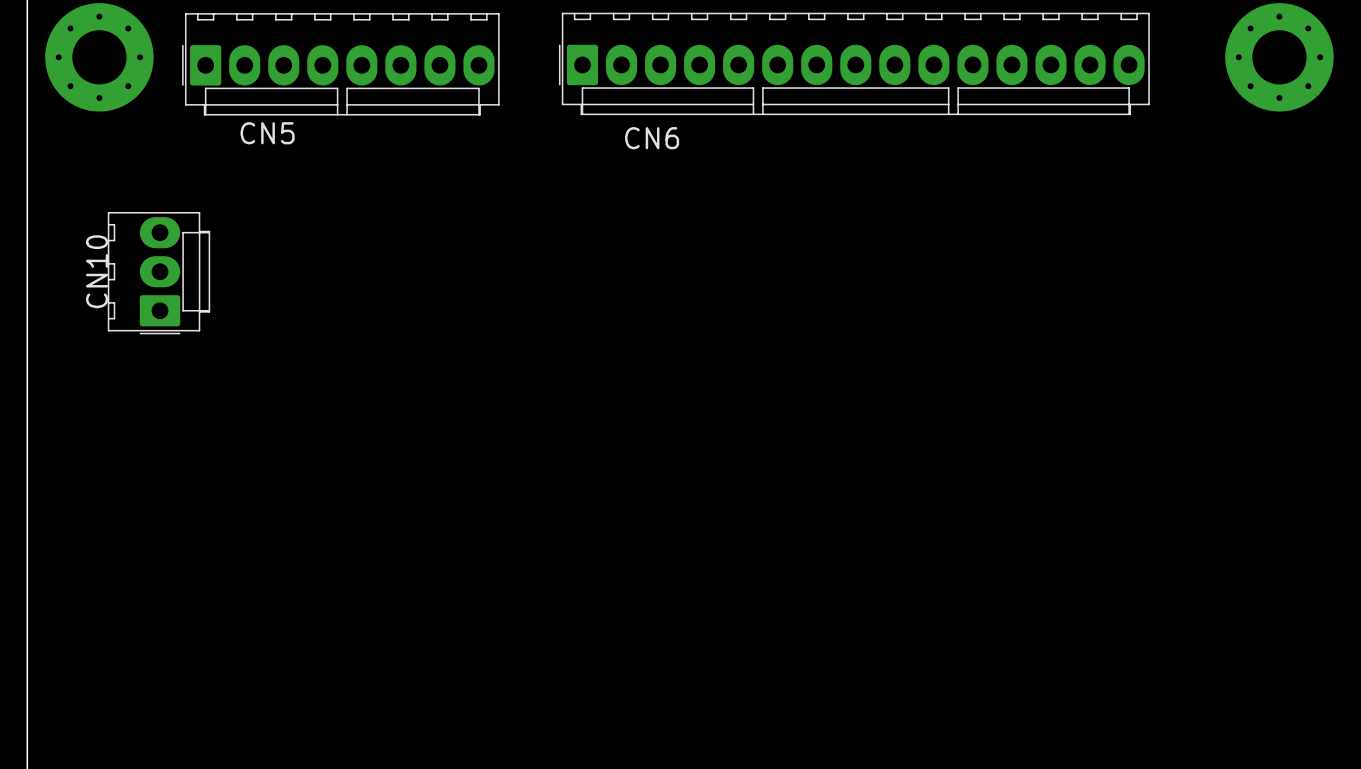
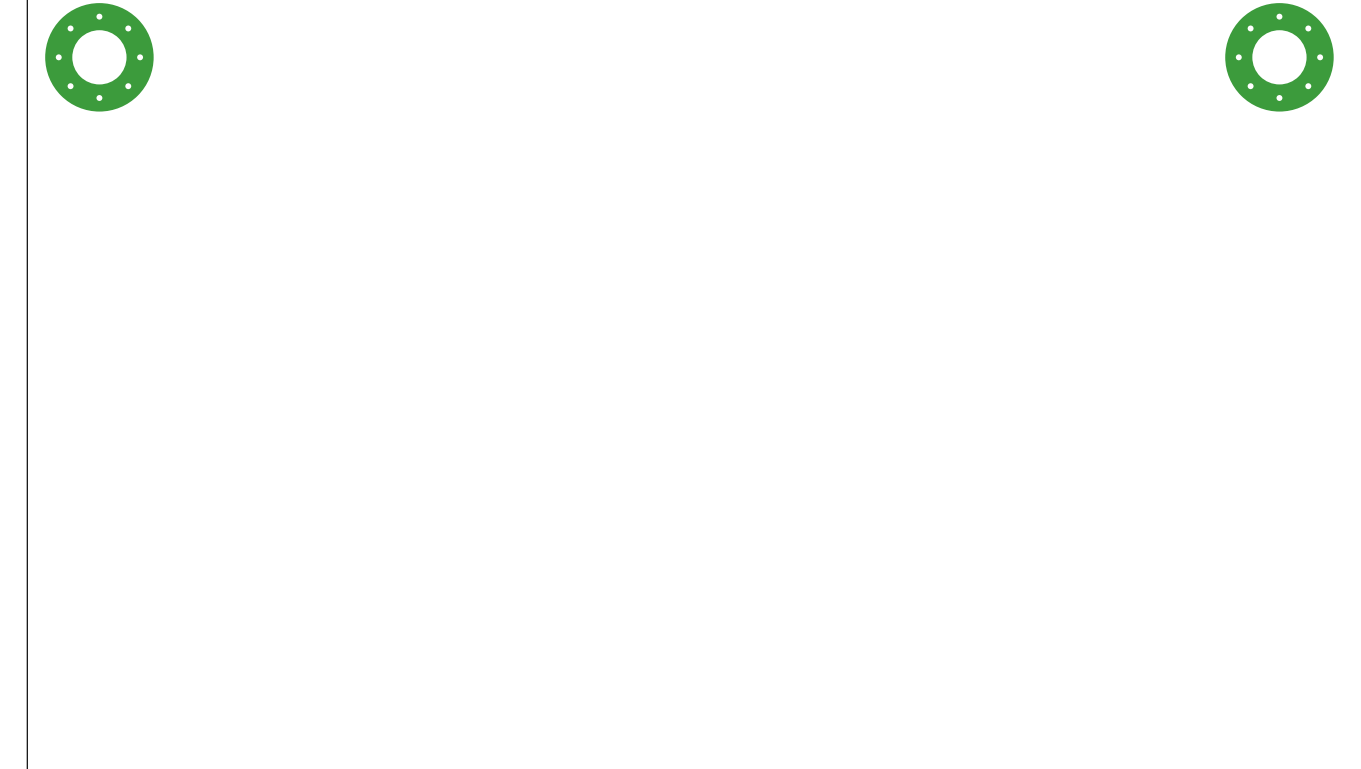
CN6: (854, 63) -> none
CN5: (340, 64) -> none
CN10: (158, 273) -> none

